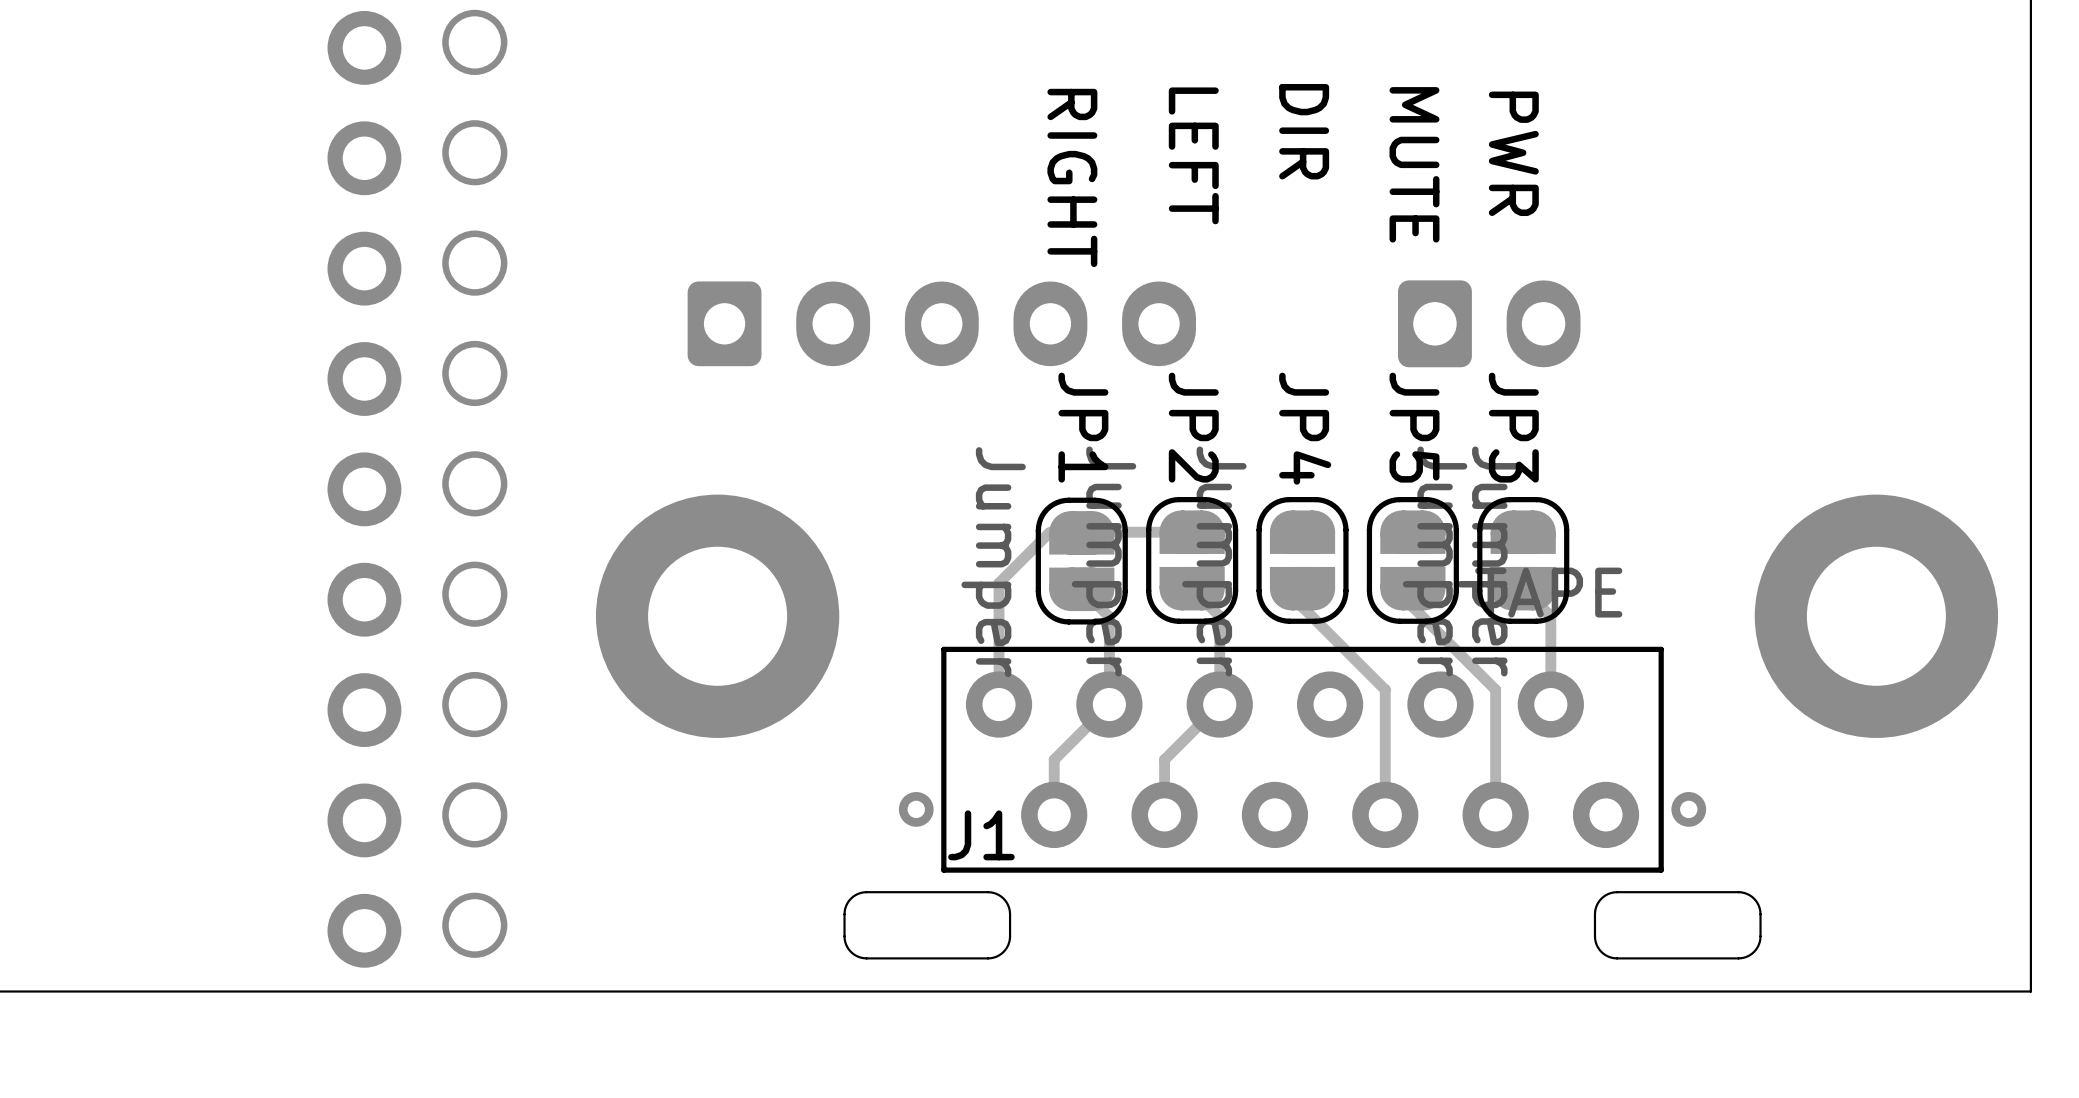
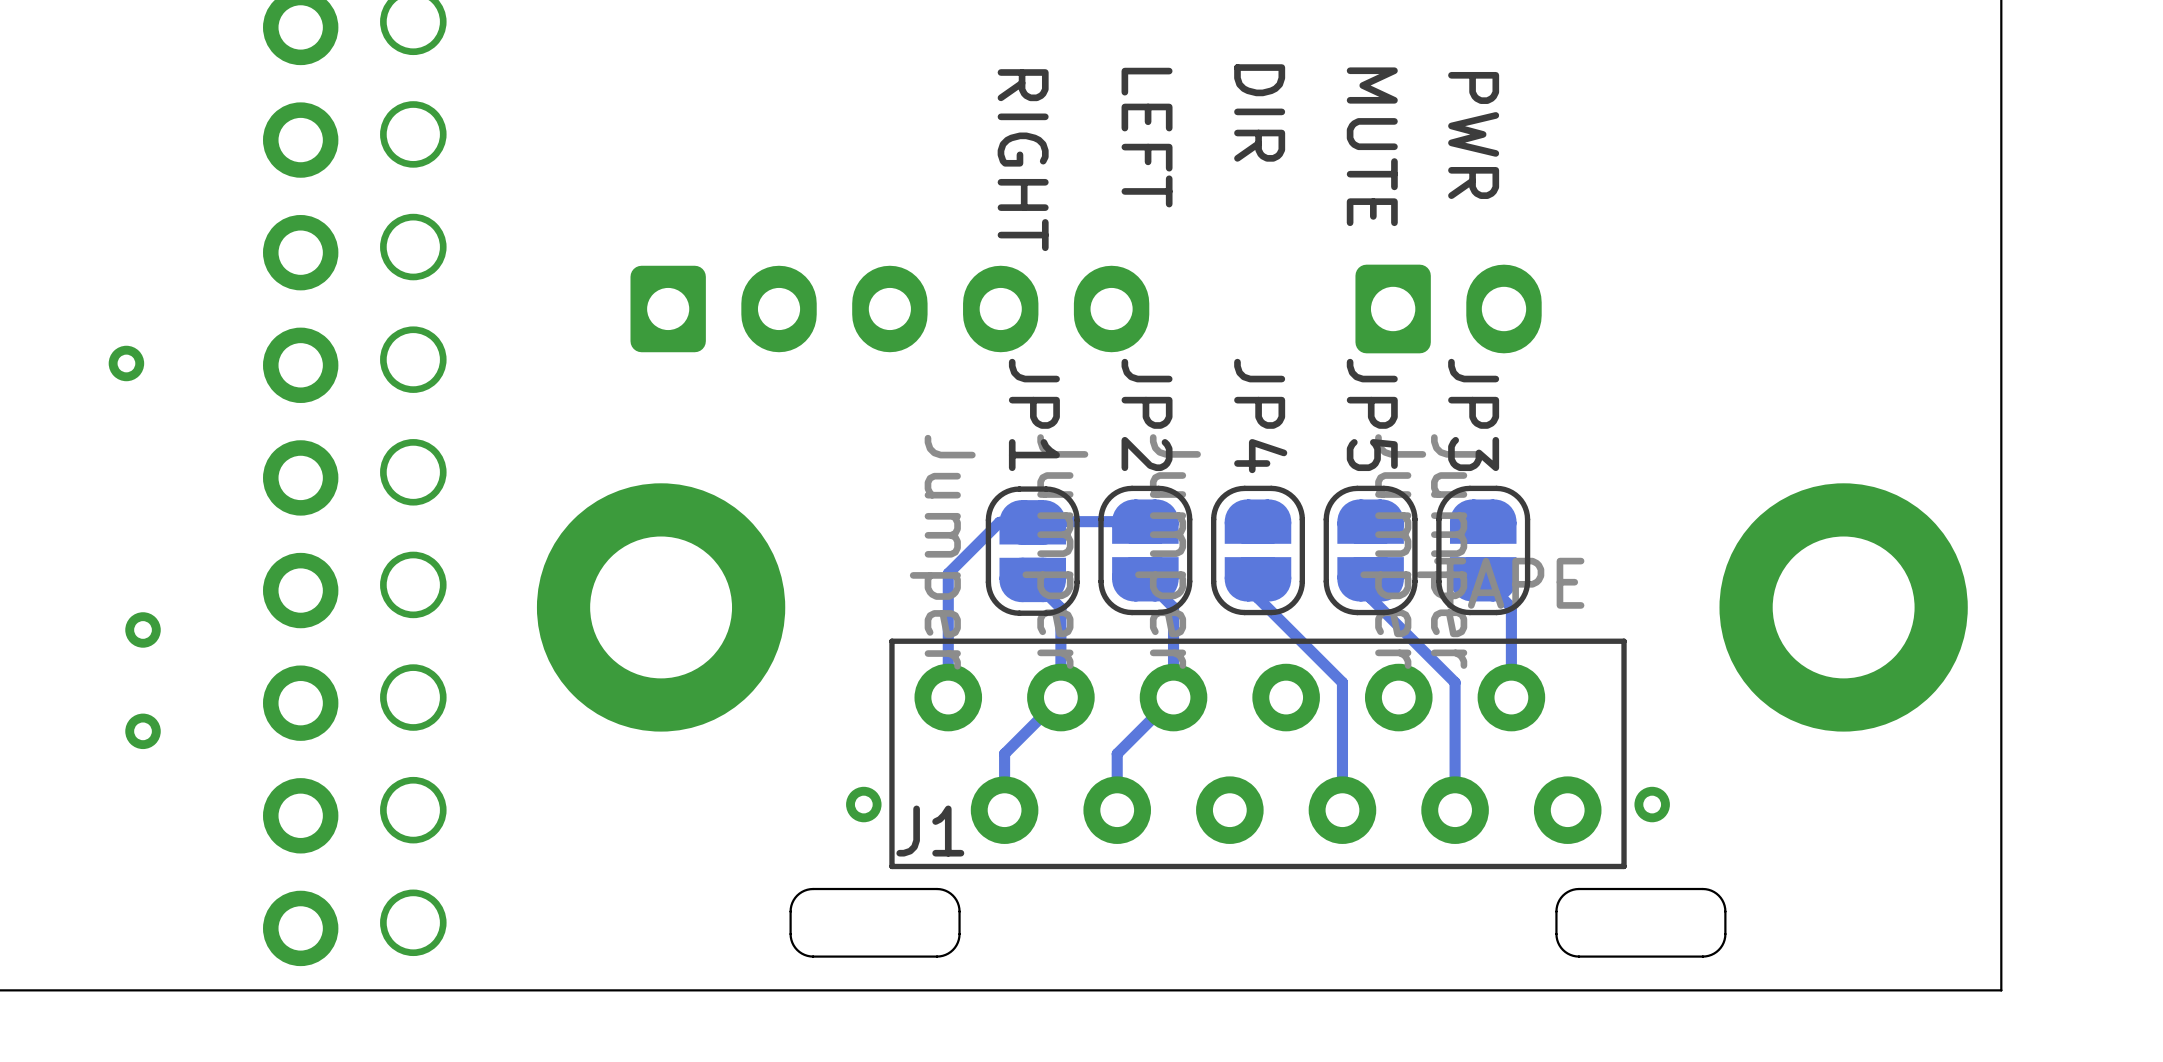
via: none -> (126, 363)
via: none -> (143, 629)
via: none -> (143, 731)

